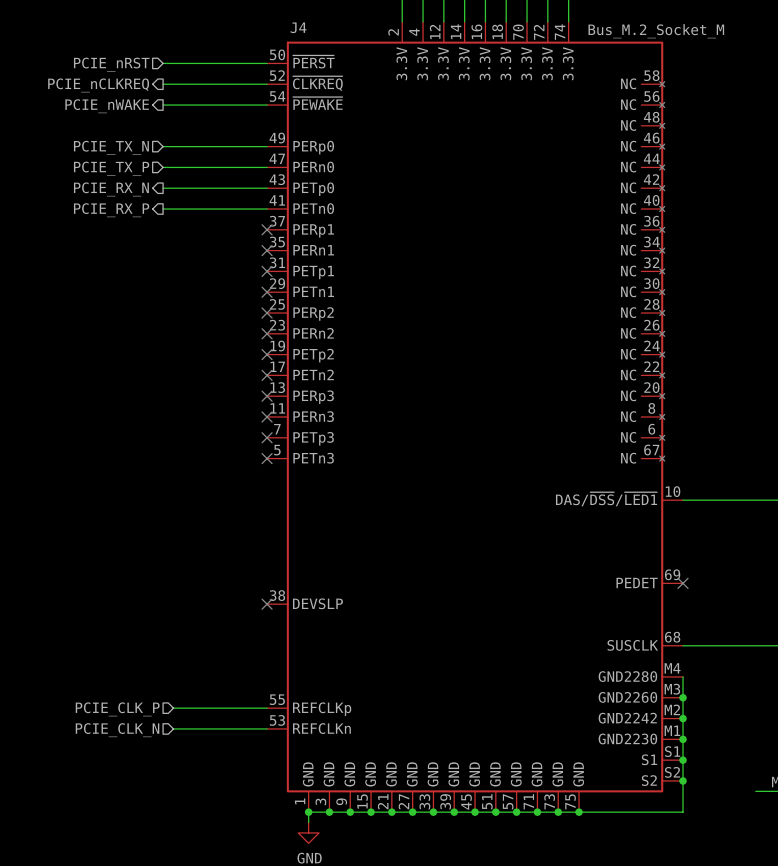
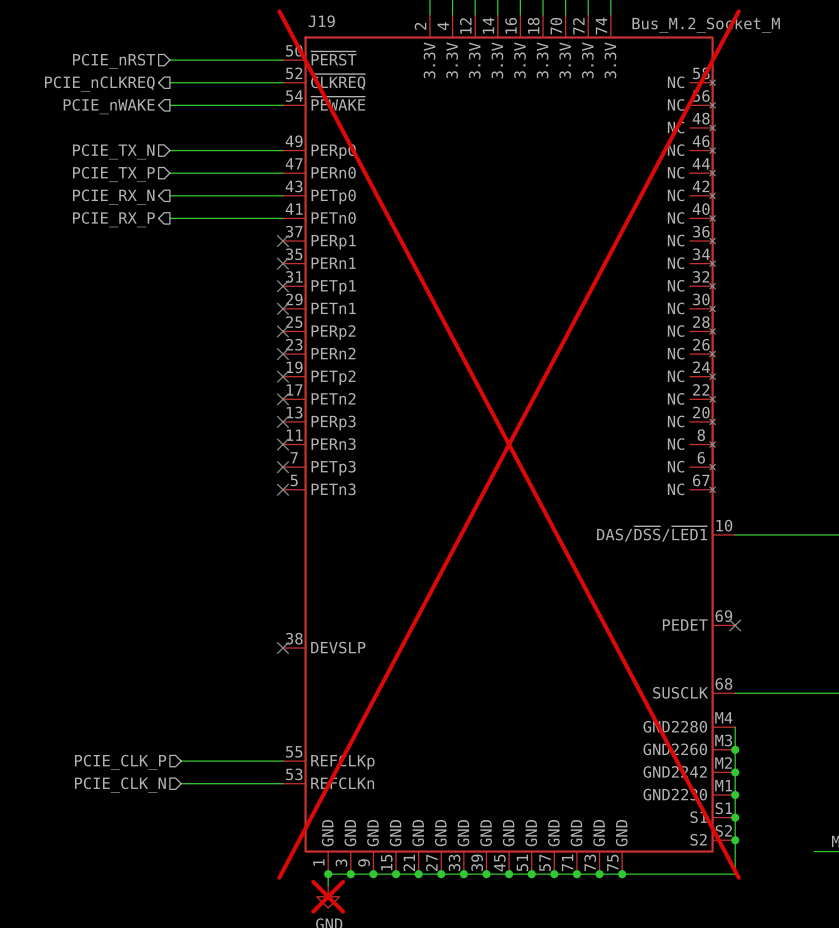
J4 name: J4 (298, 27) -> J19 (321, 21)
J4 do-not-place cross: none -> (509, 444)
power symbol do-not-place cross: none -> (328, 896)

